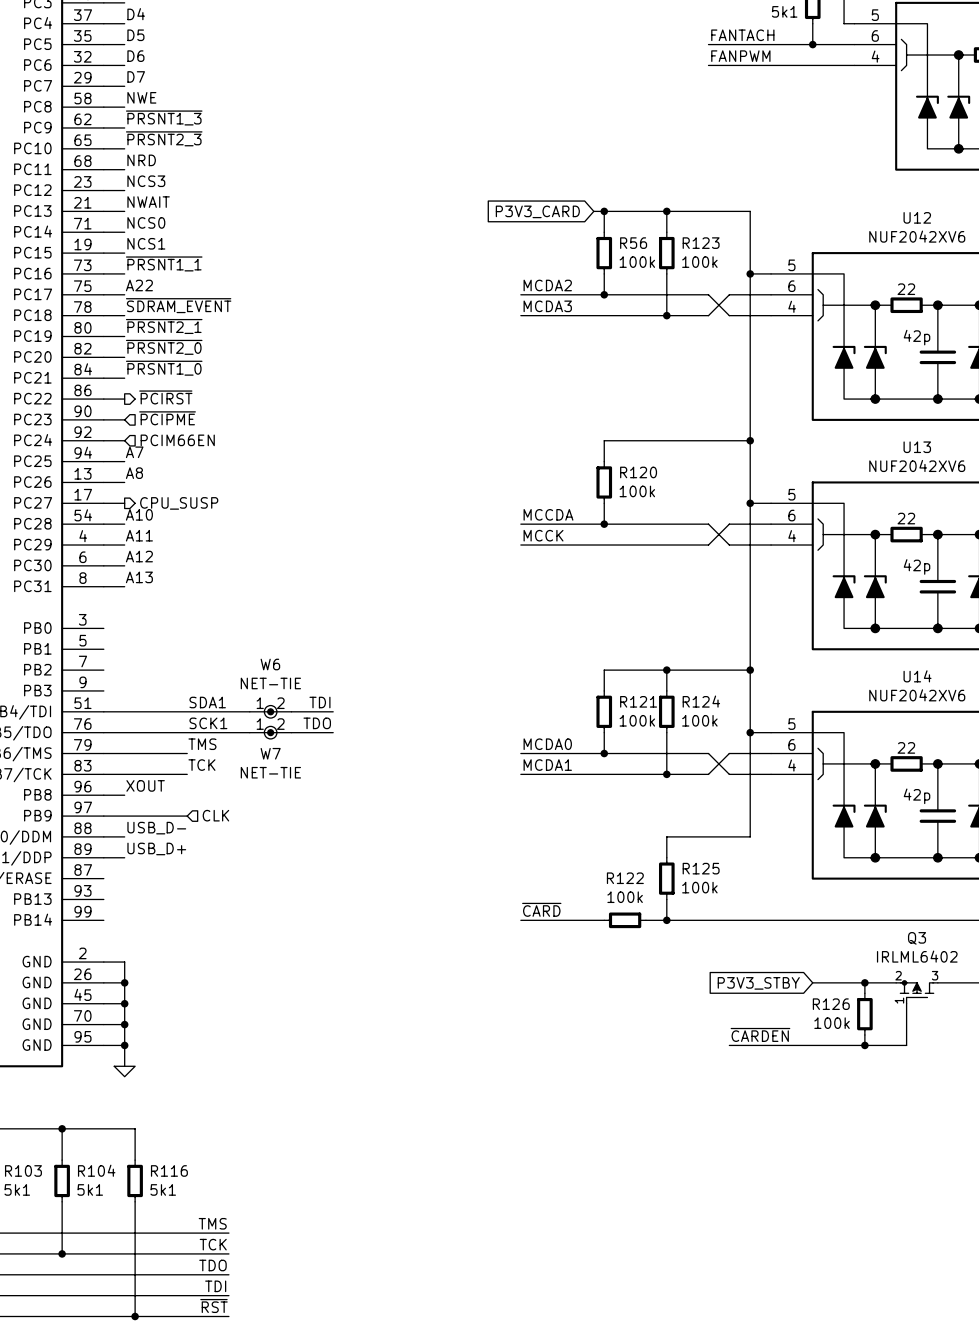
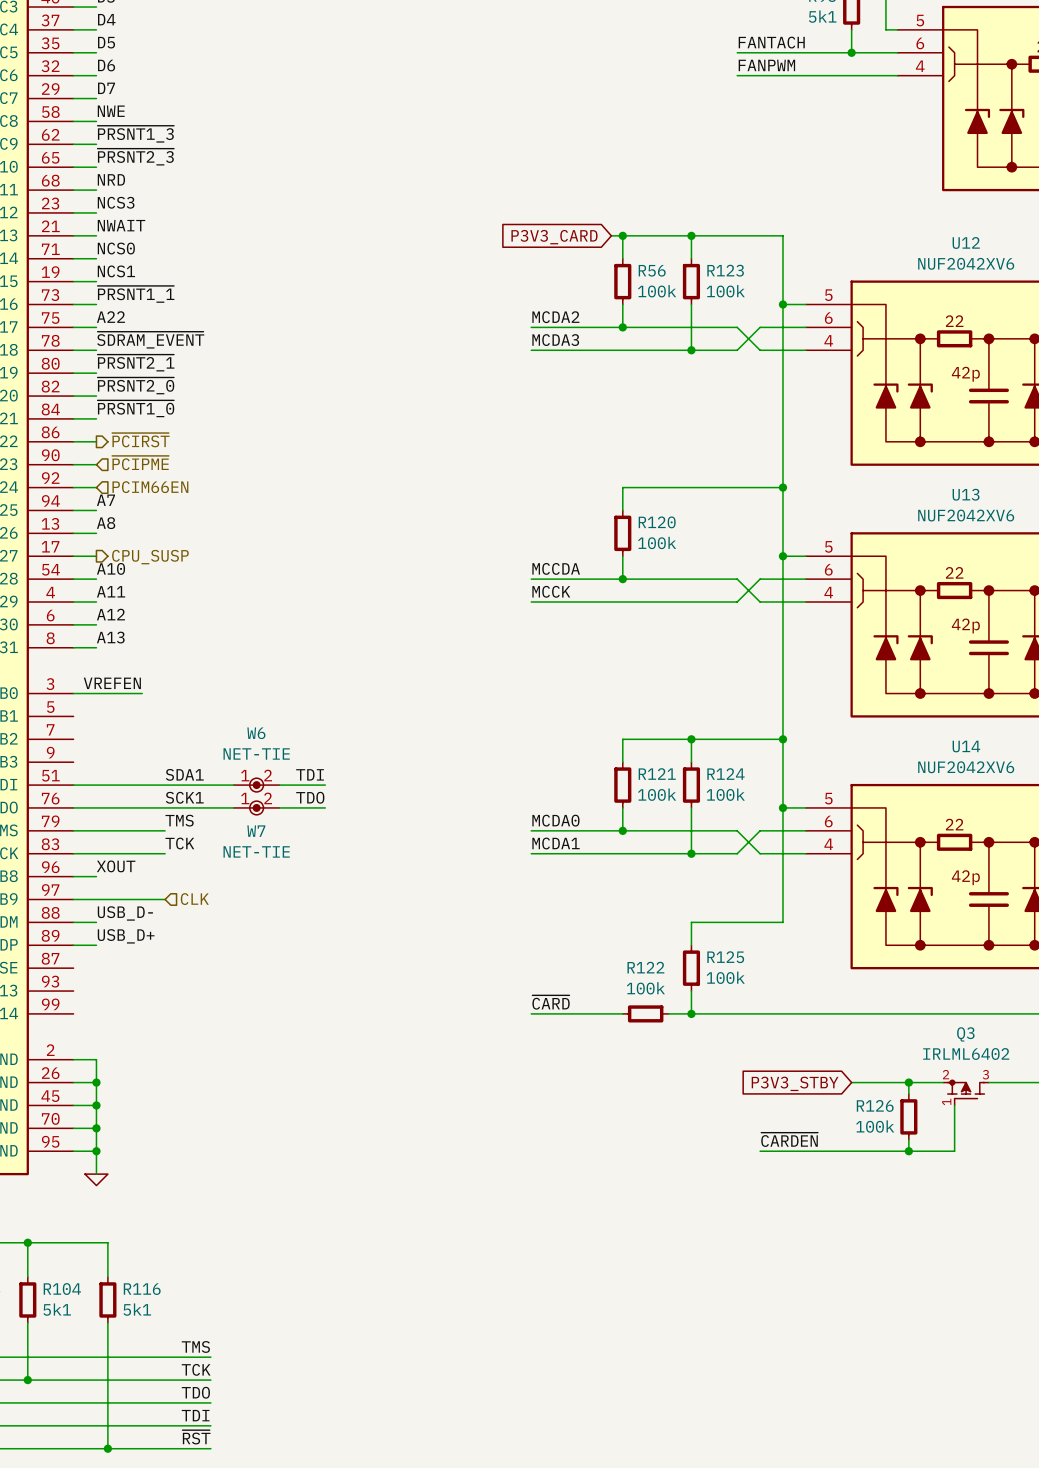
label: none -> VREFEN (112, 683)
wire: none -> (73, 693) (142, 693)

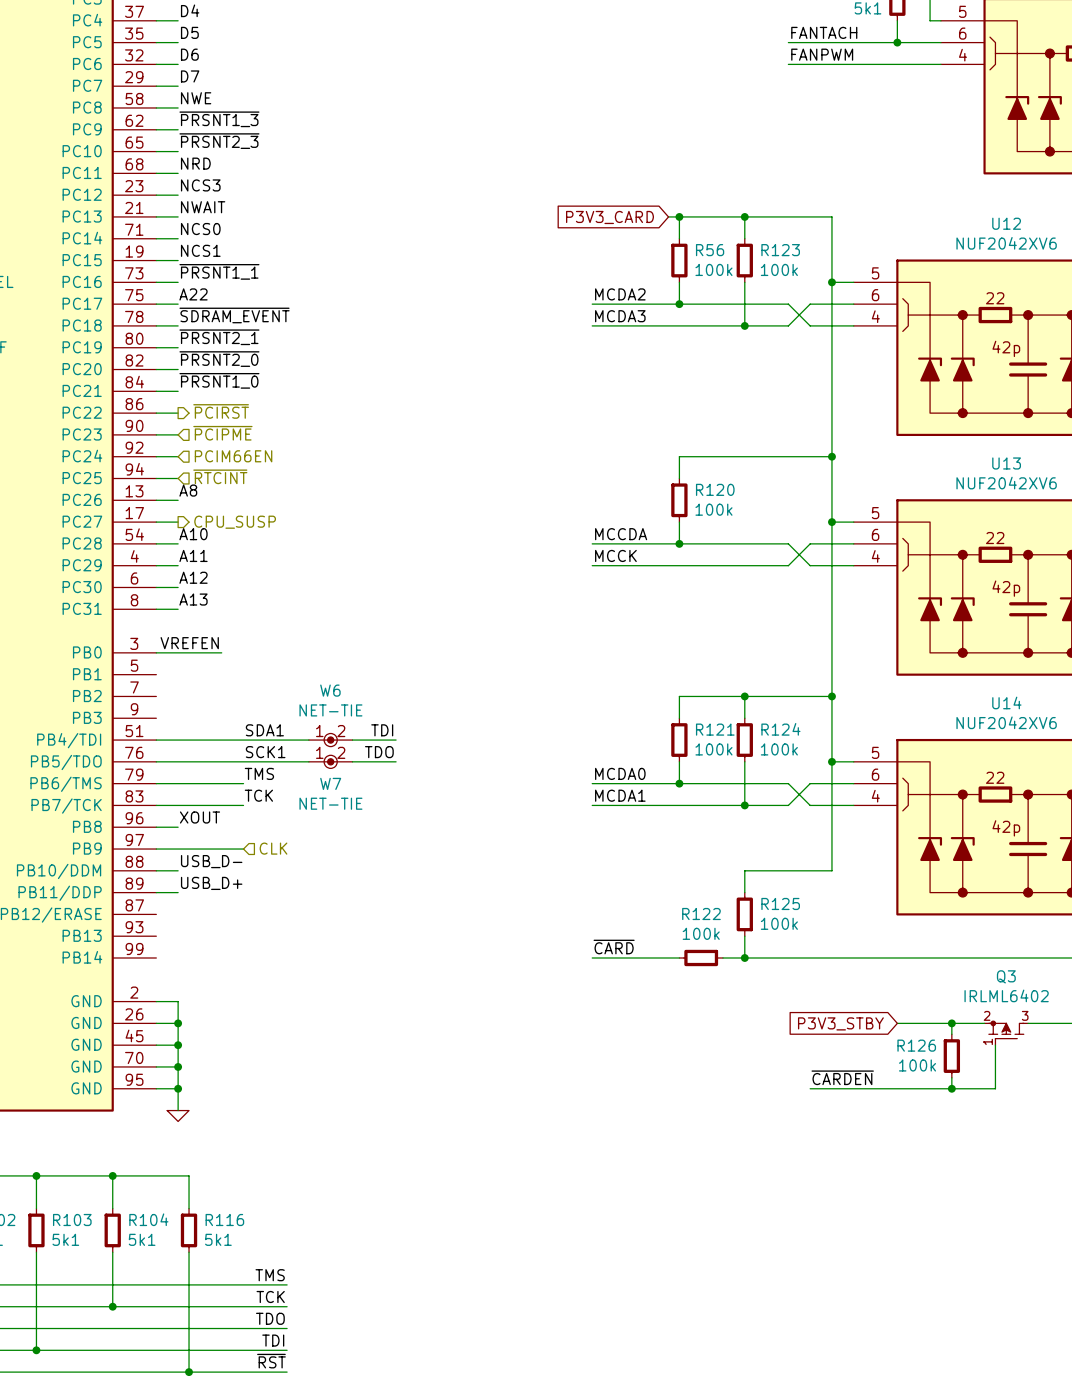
label: A7 (105, 500) -> none
hierarchical label: none -> ~{RTCINT} (220, 476)

